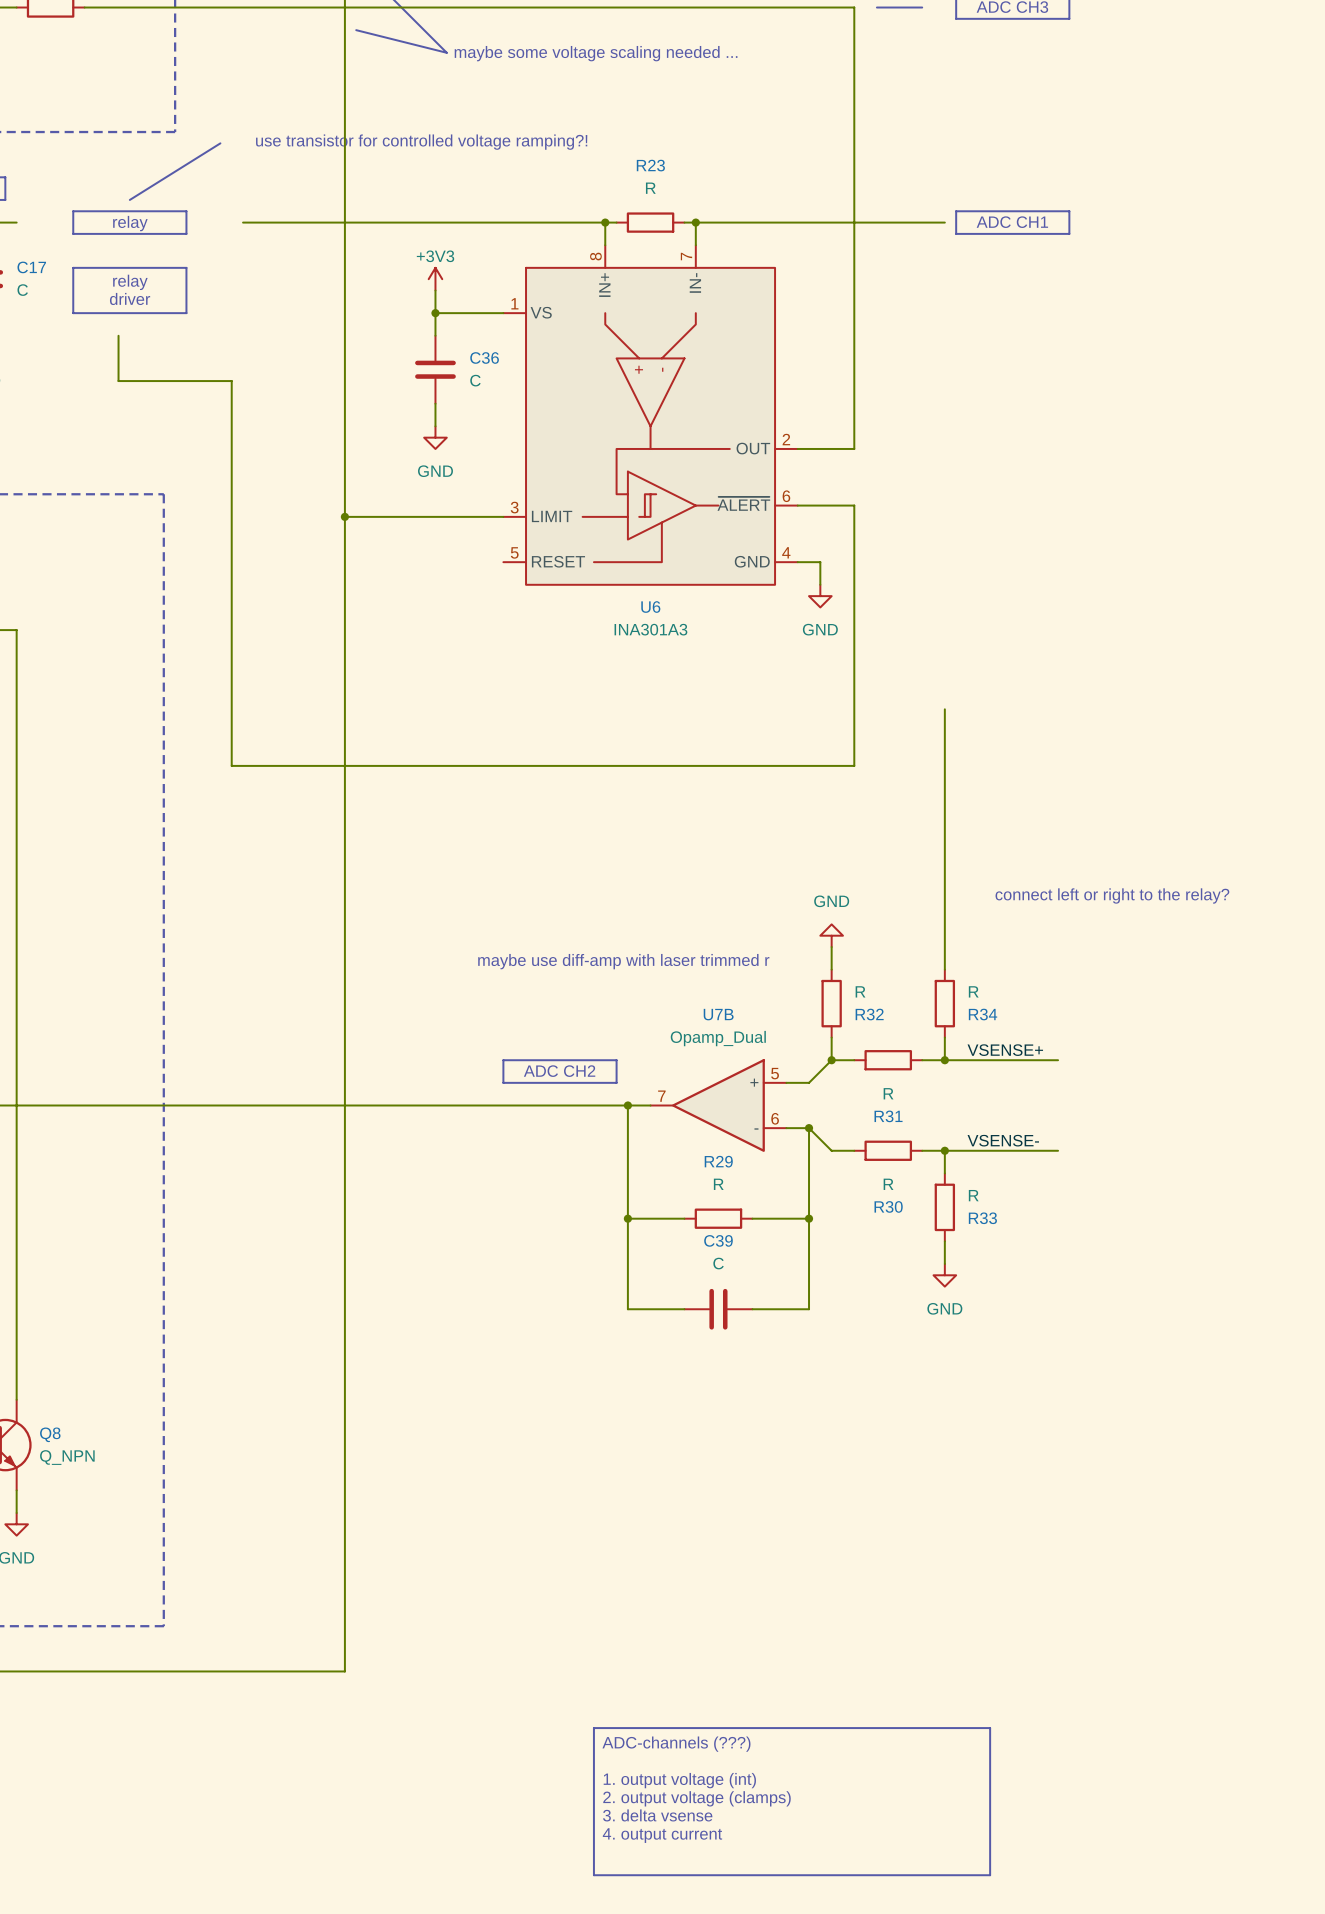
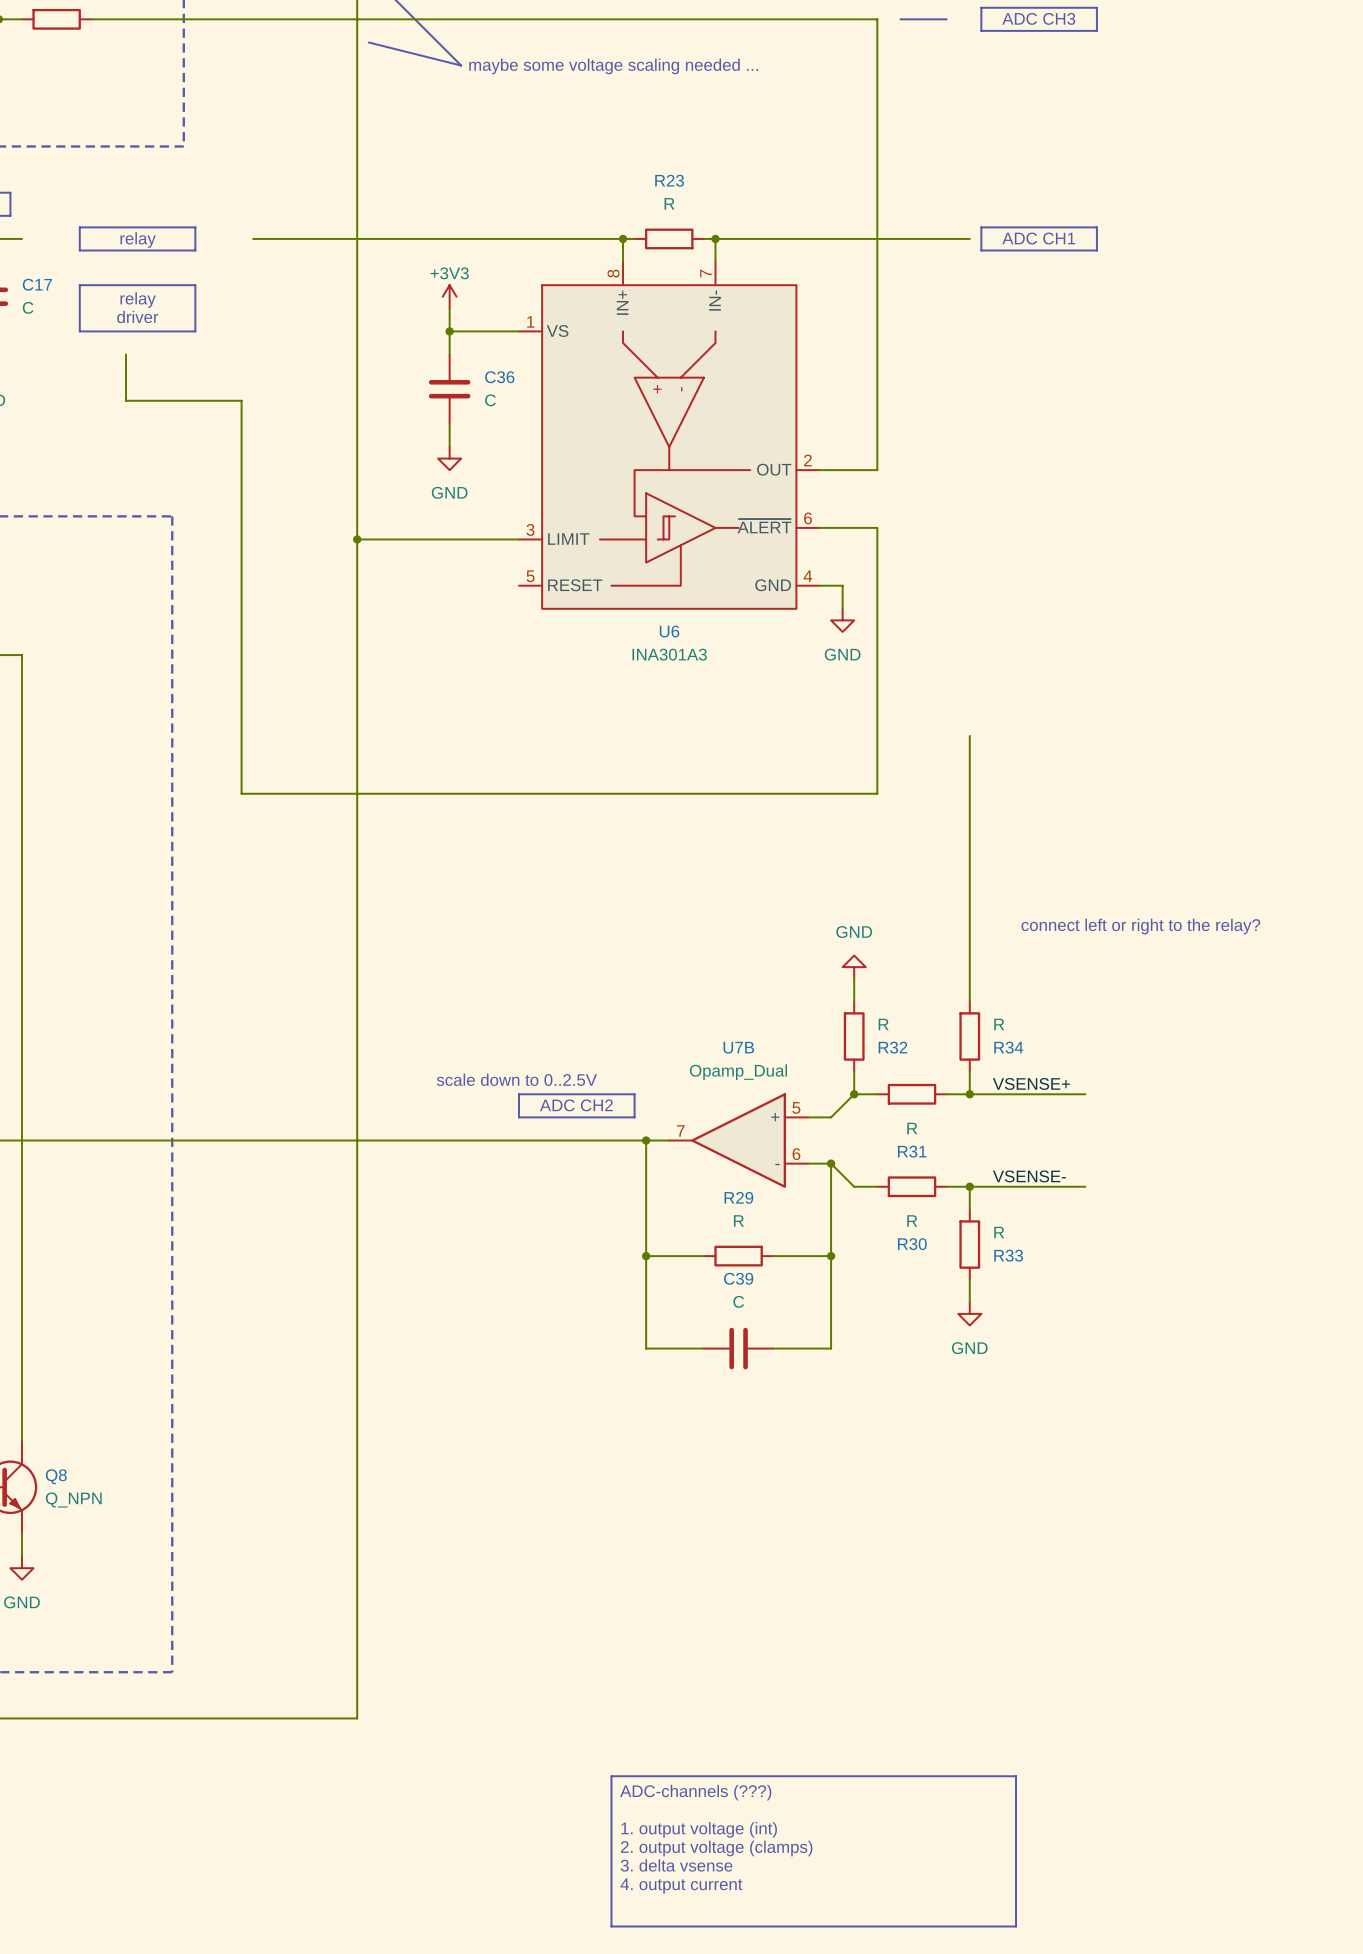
text: use transistor for controlled voltage ramping?! (421, 142) -> none
line: (220, 143) (129, 199) -> none
text: maybe use diff-amp with laser trimmed r (623, 961) -> none
text: none -> scale down to 0..2.5V (516, 1079)

